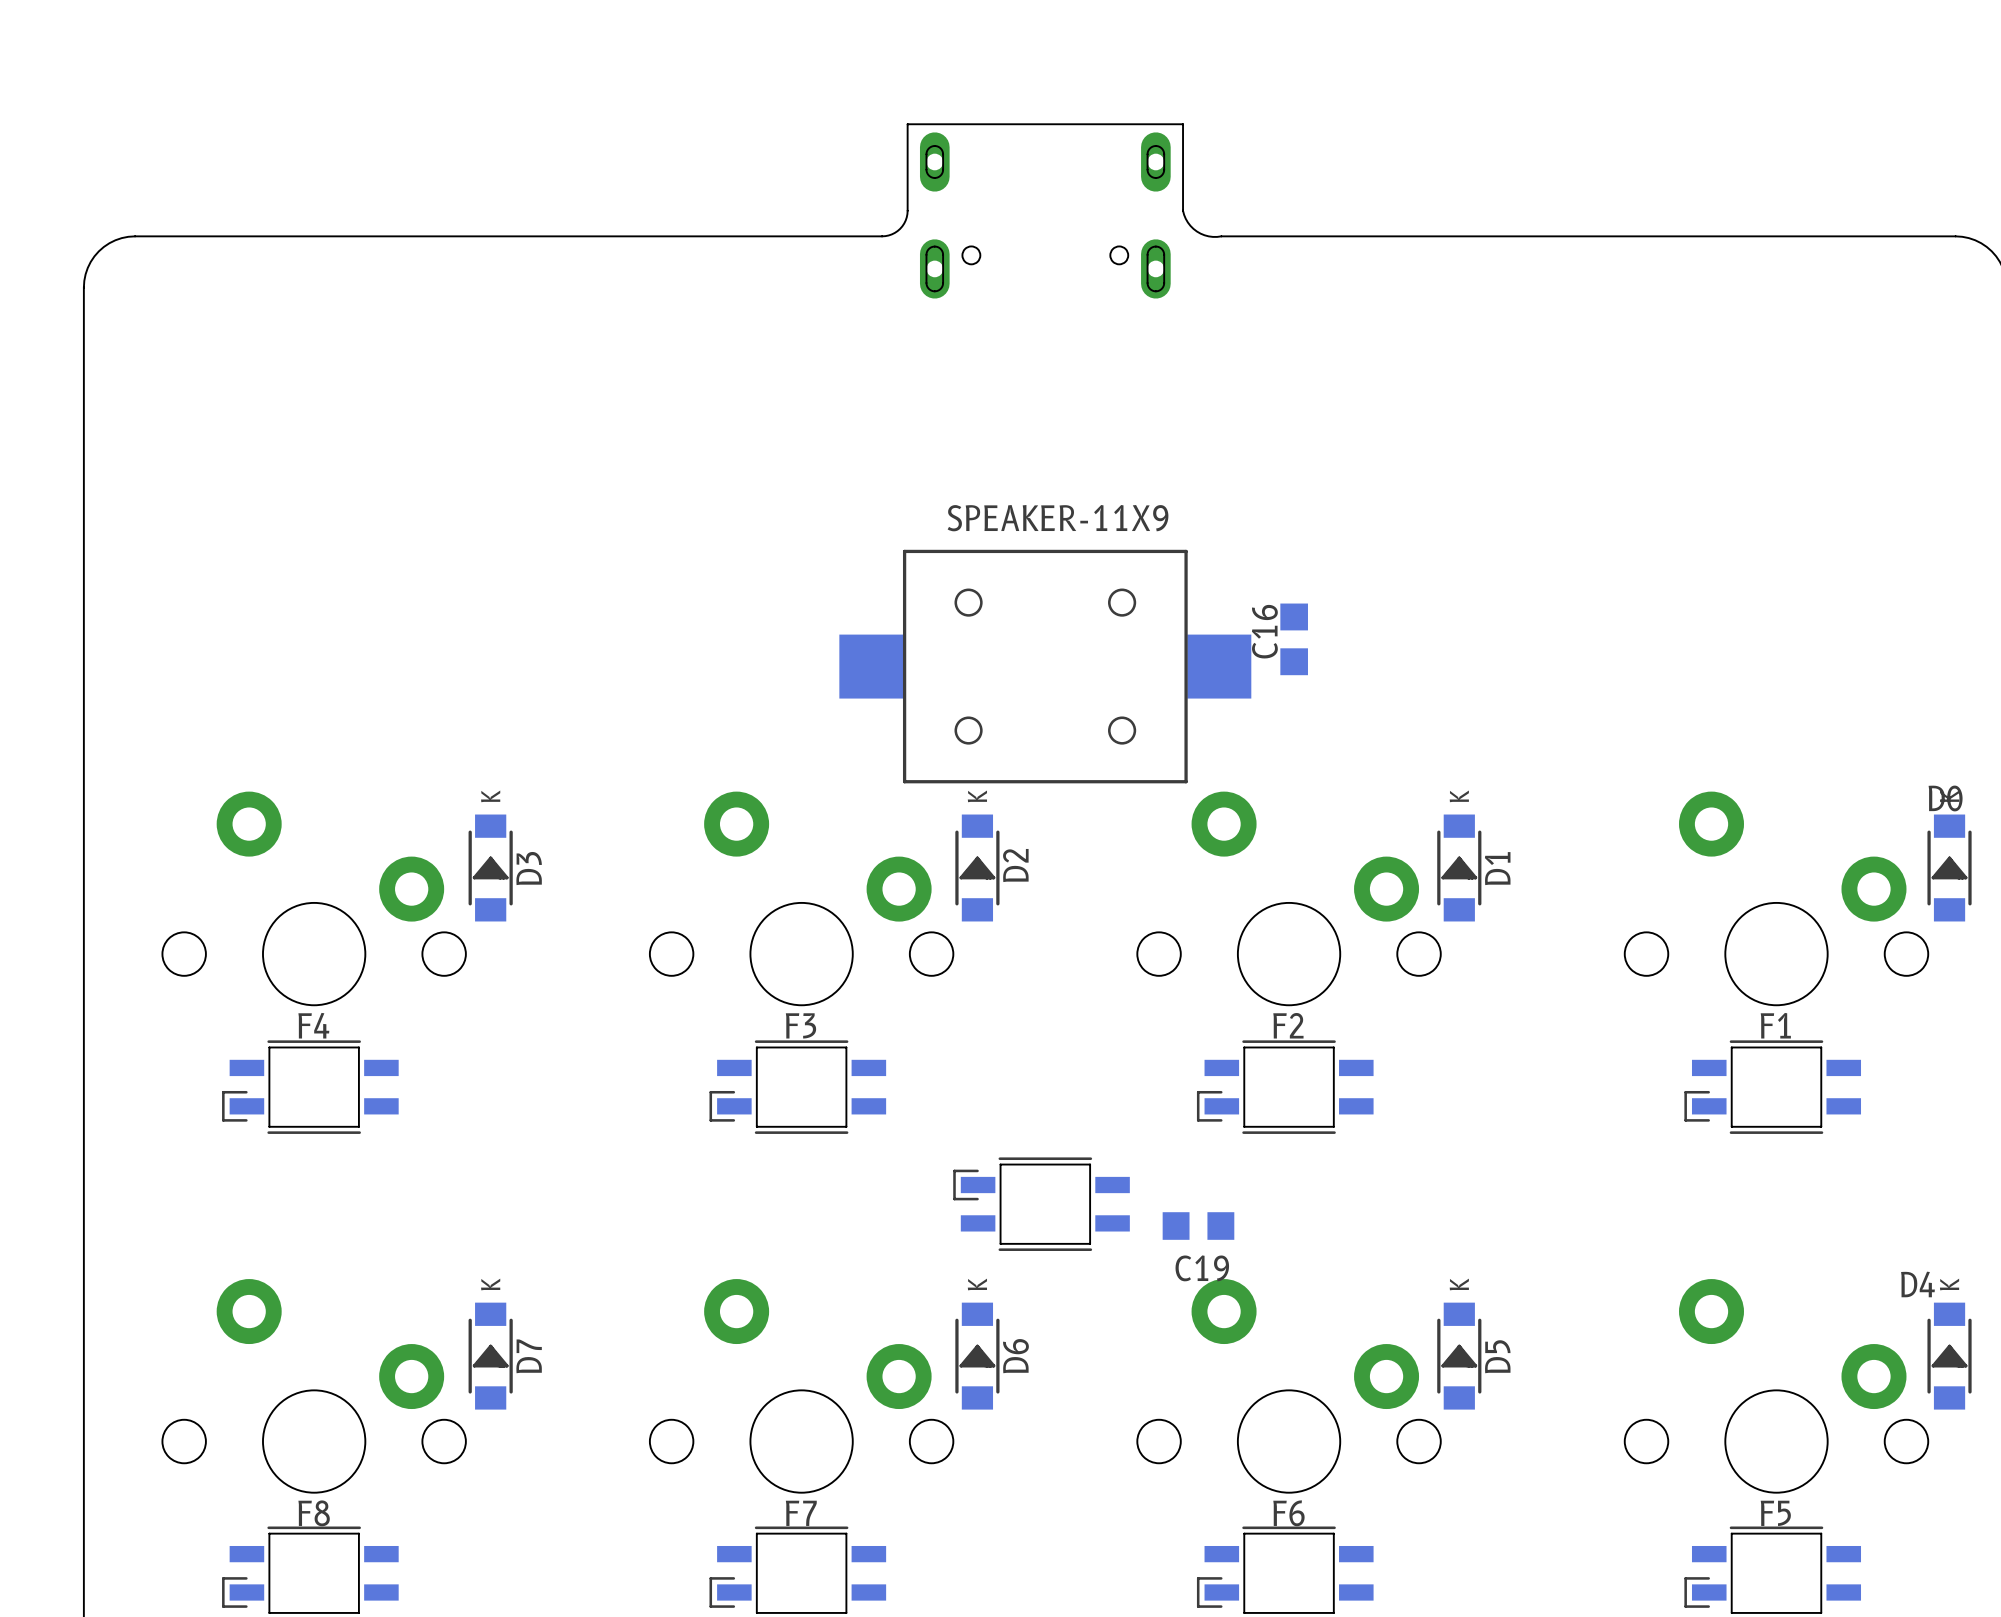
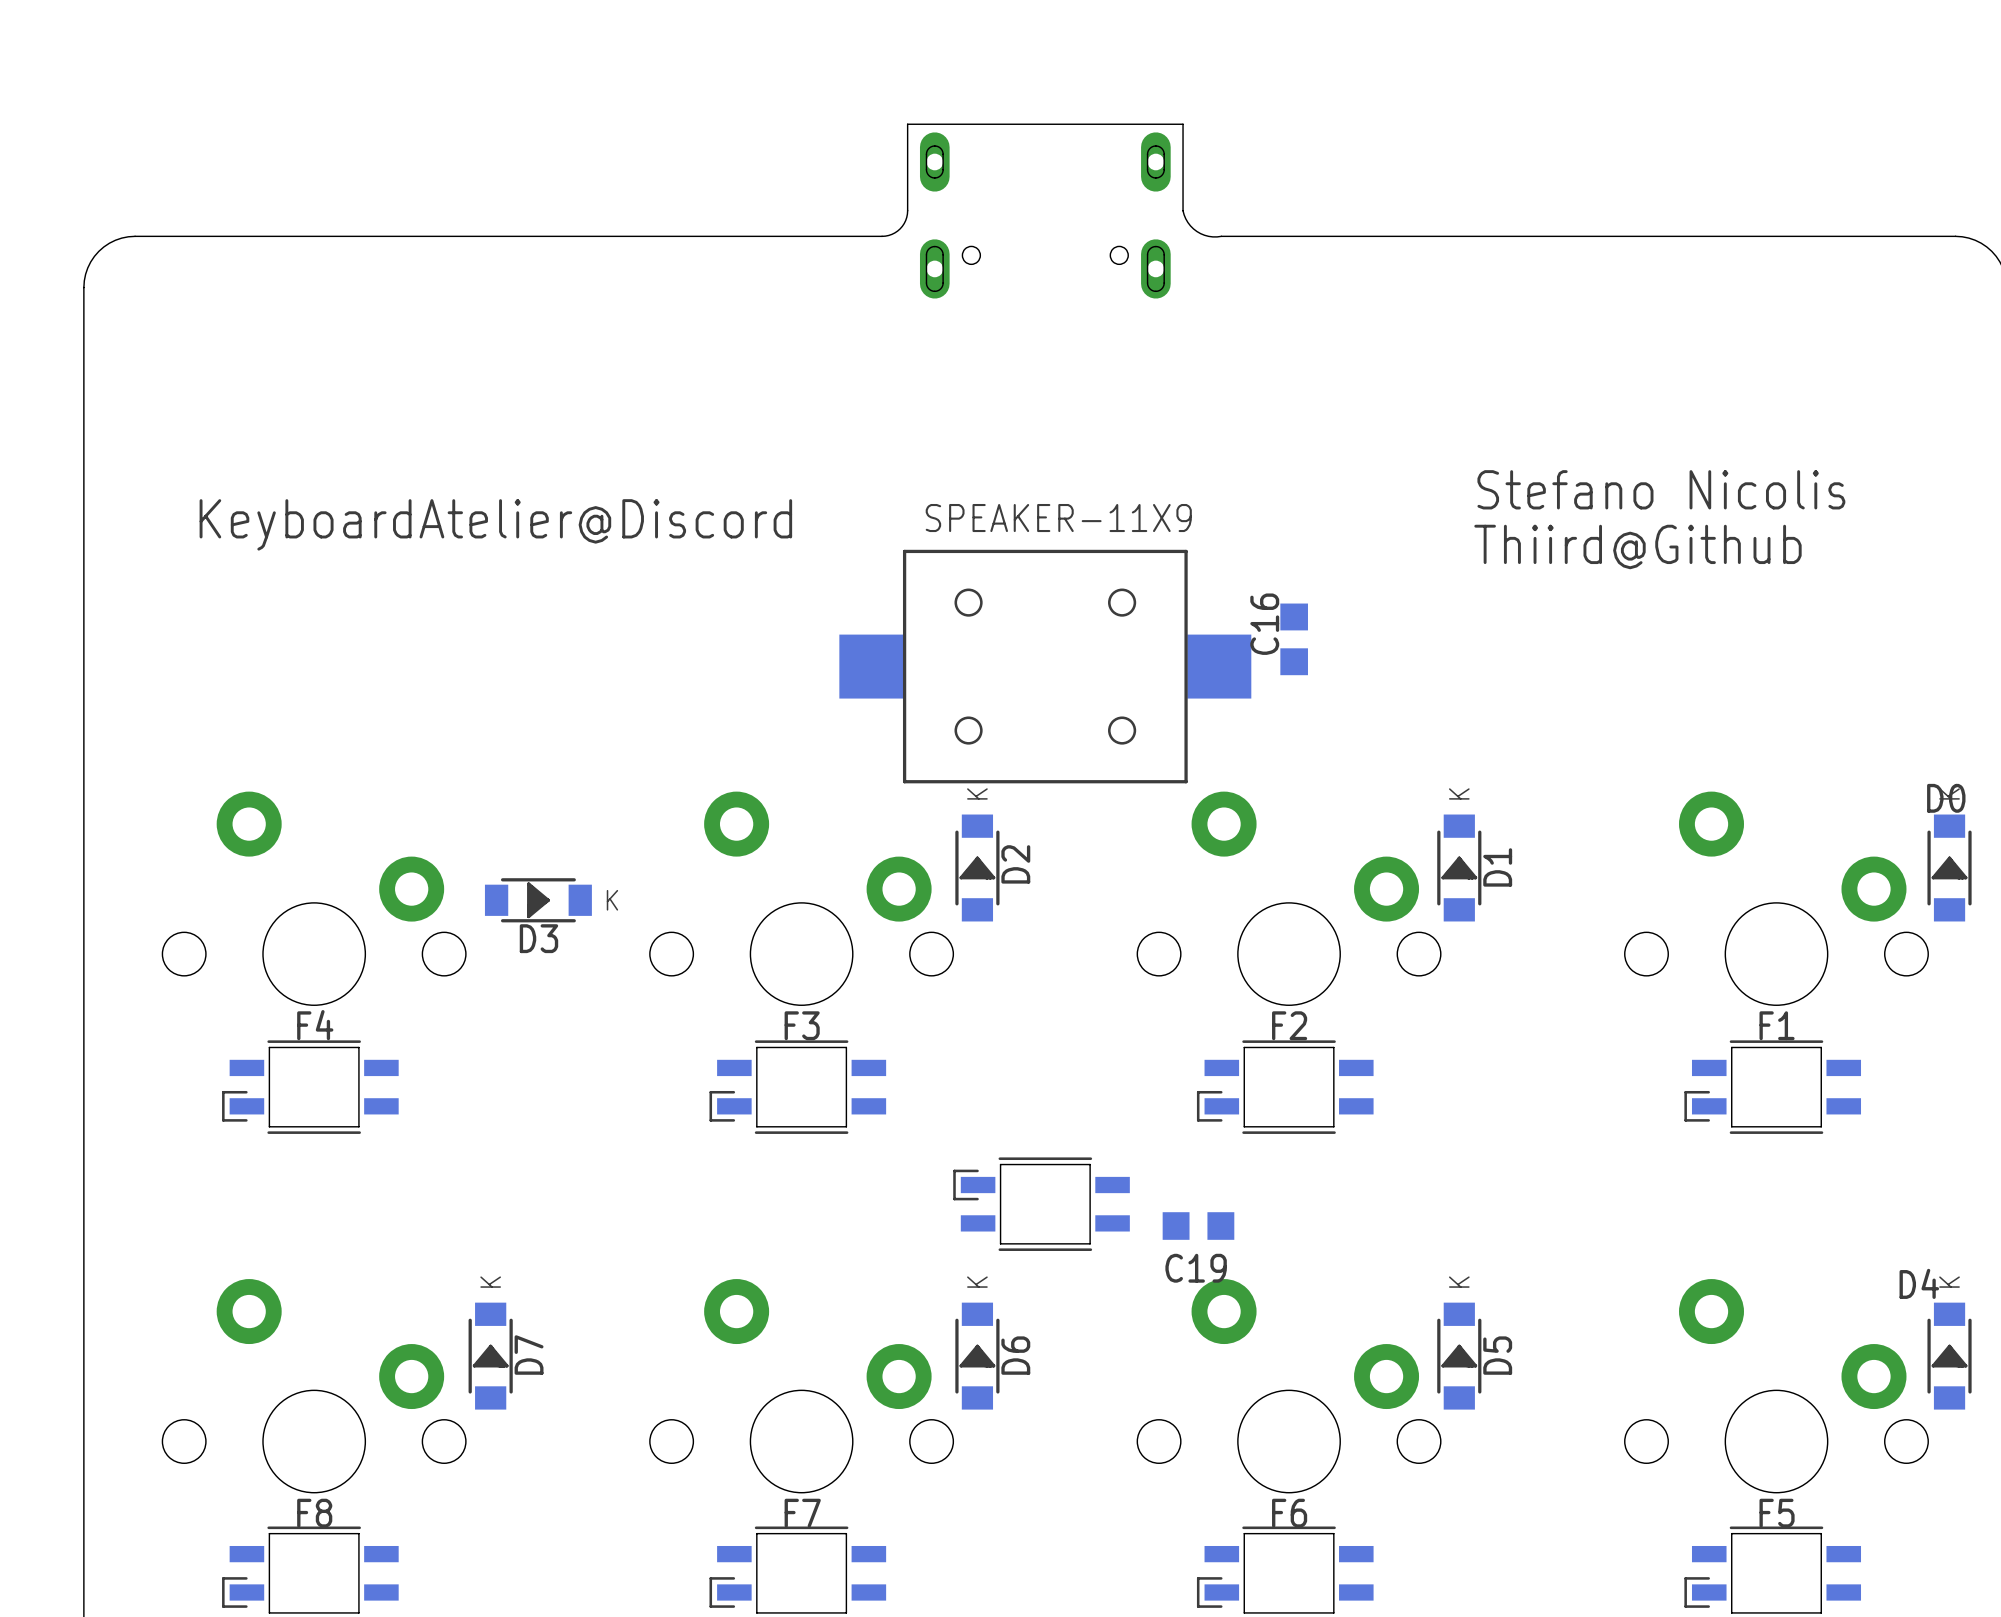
text: none -> Stefano Nicolis (1661, 489)
text: none -> KeyboardAtelier@Discord (495, 524)
text: none -> Thiird@Github (1637, 546)
D3 rotation: 0° (490, 867) -> 90° clockwise (538, 900)

